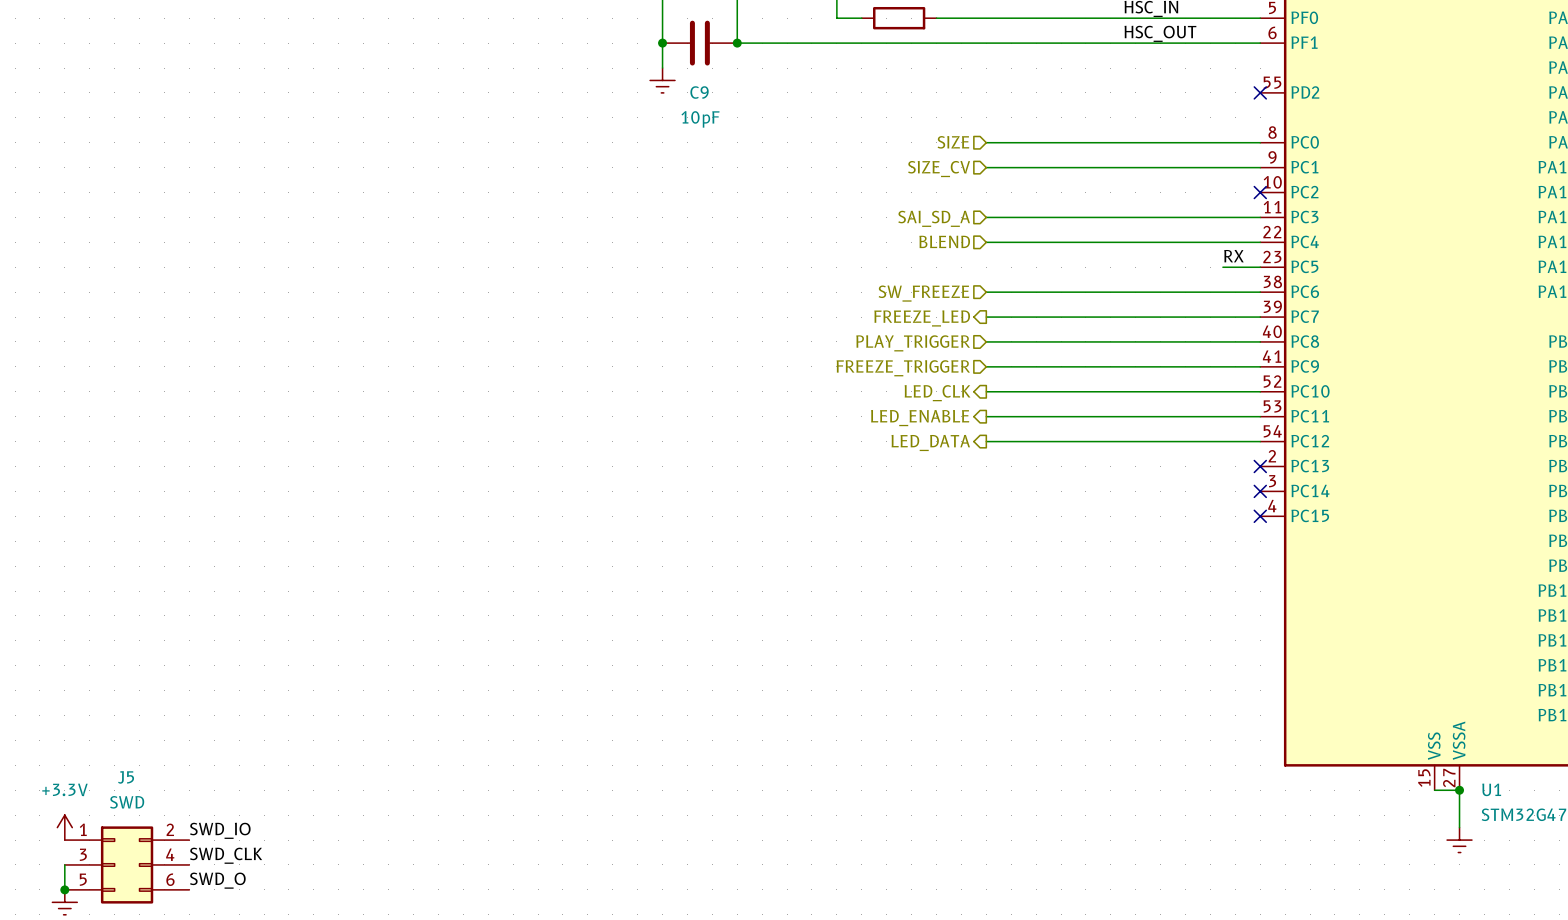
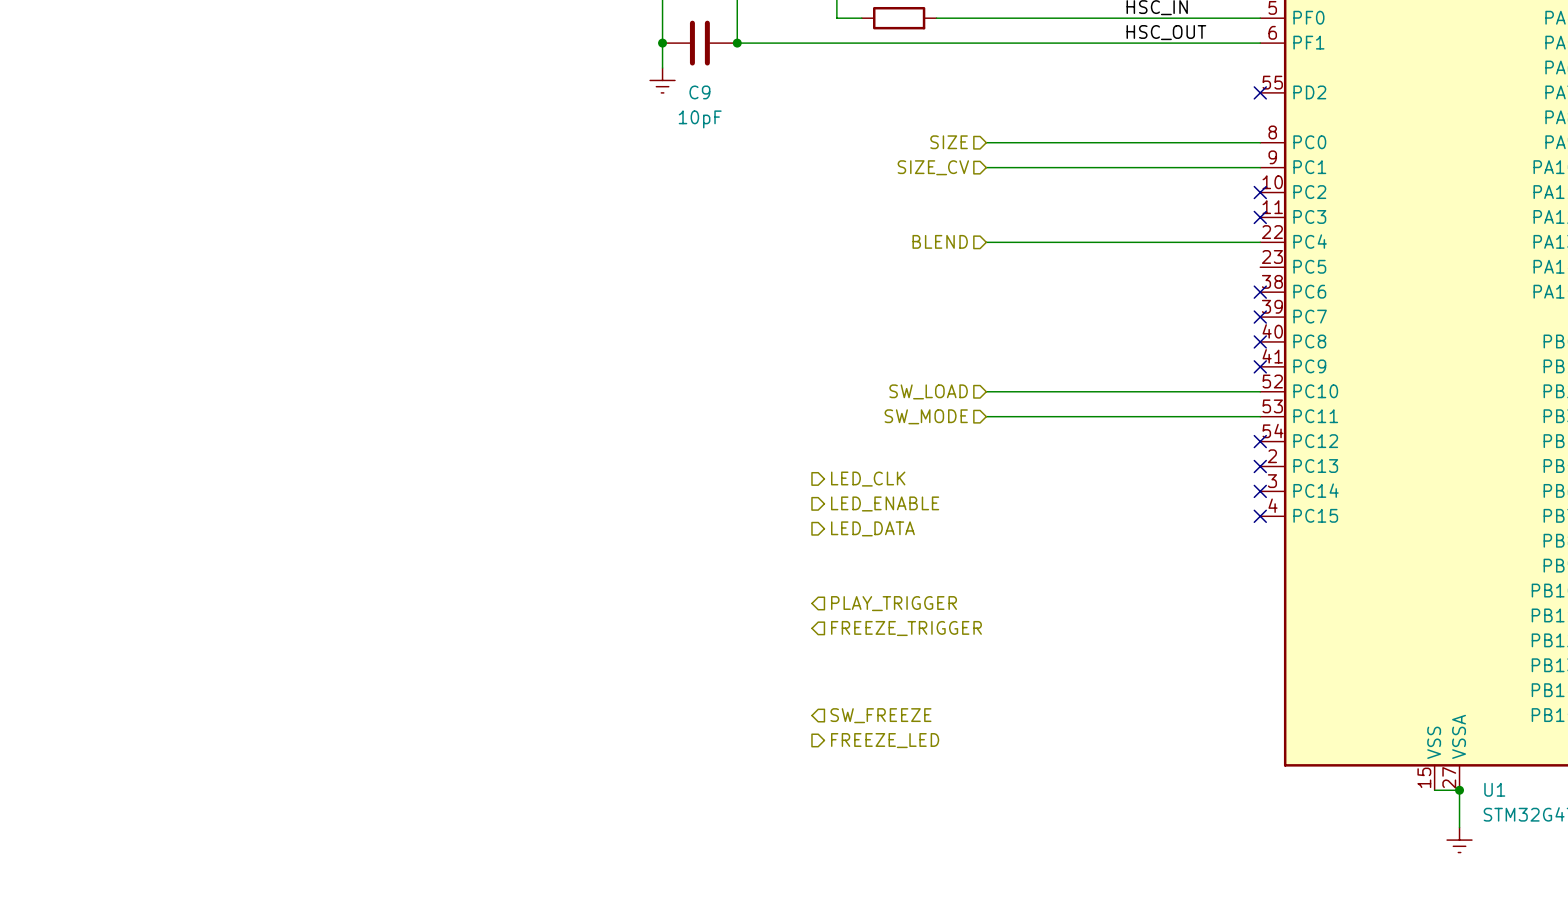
wire: (986, 217) (1260, 217) -> none
no-connect mark: none -> (1260, 217)
hierarchical label: SAI_SD_A (934, 218) -> none
label: RX (1233, 256) -> none
wire: (1222, 267) (1260, 267) -> none
wire: (986, 292) (1260, 292) -> none
no-connect mark: none -> (1260, 292)
hierarchical label: SW_FREEZE (923, 293) -> none
wire: (986, 317) (1260, 317) -> none
no-connect mark: none -> (1260, 317)
hierarchical label: FREEZE_LED (922, 318) -> none
wire: (986, 341) (1260, 341) -> none
no-connect mark: none -> (1260, 341)
hierarchical label: PLAY_TRIGGER (913, 343) -> none
wire: (986, 366) (1260, 366) -> none
no-connect mark: none -> (1260, 366)
hierarchical label: FREEZE_TRIGGER (903, 368) -> none
hierarchical label shape: output (937, 393) -> input (928, 391)
hierarchical label: LED_CLK (937, 393) -> SW_LOAD (928, 391)
hierarchical label shape: output (920, 418) -> input (926, 416)
hierarchical label: LED_ENABLE (920, 418) -> SW_MODE (926, 416)
wire: (986, 441) (1260, 441) -> none
no-connect mark: none -> (1260, 441)
hierarchical label rotation: 0° (930, 442) -> 180° (872, 528)
hierarchical label: none -> LED_CLK (868, 479)
hierarchical label: none -> LED_ENABLE (885, 503)
hierarchical label: none -> PLAY_TRIGGER (894, 603)
hierarchical label: none -> FREEZE_TRIGGER (906, 628)
hierarchical label: none -> SW_FREEZE (880, 715)
hierarchical label: none -> FREEZE_LED (885, 740)
power symbol: +3.3V (64, 827) -> none
label: SWD_IO (220, 830) -> none
label: SWD_CLK (226, 855) -> none
wire: (64, 864) (64, 889) -> none
J5: SWD (127, 864) -> none
label: SWD_O (217, 880) -> none
junction: (64, 889) -> none
power symbol: (64, 902) -> none

